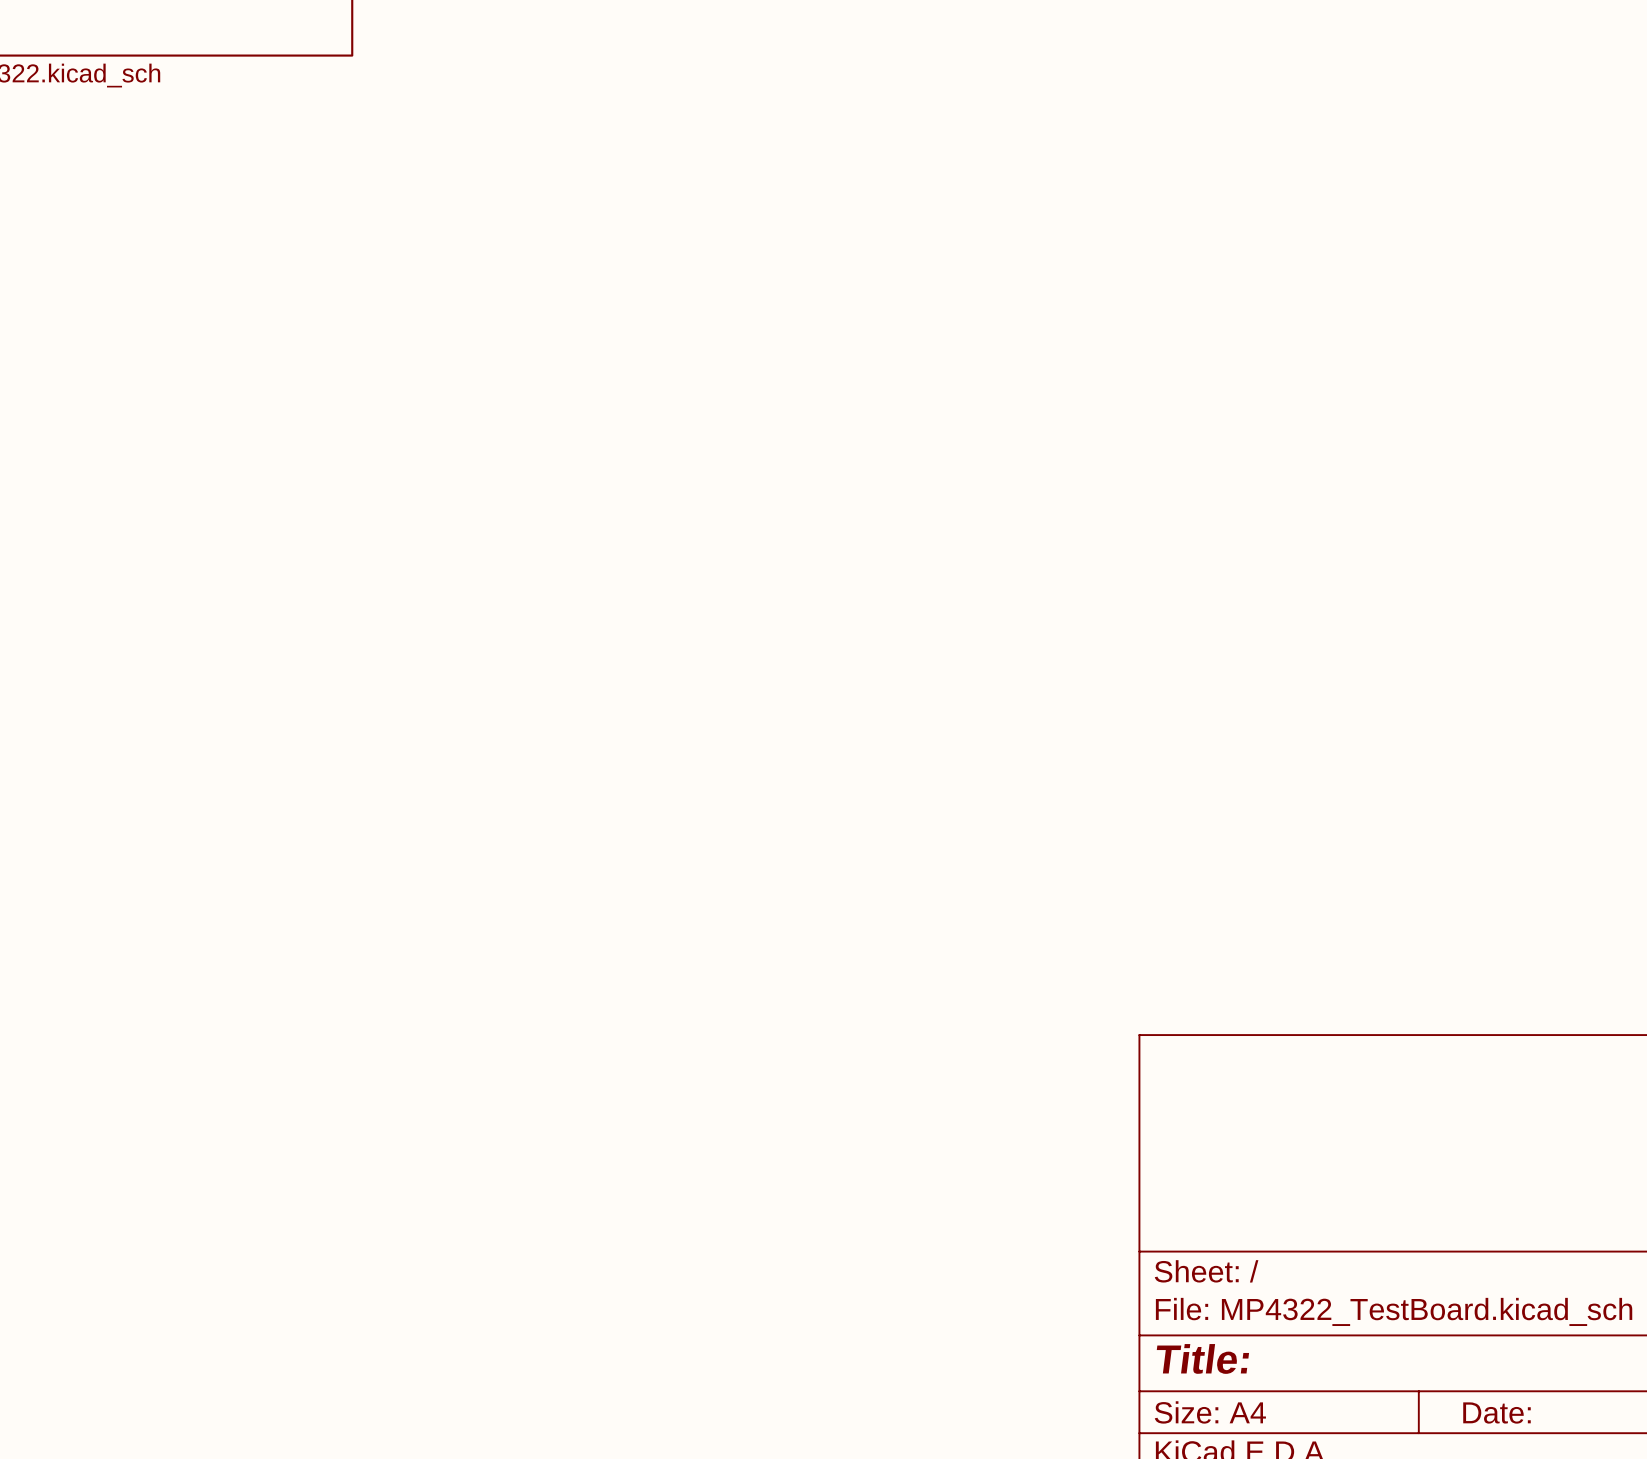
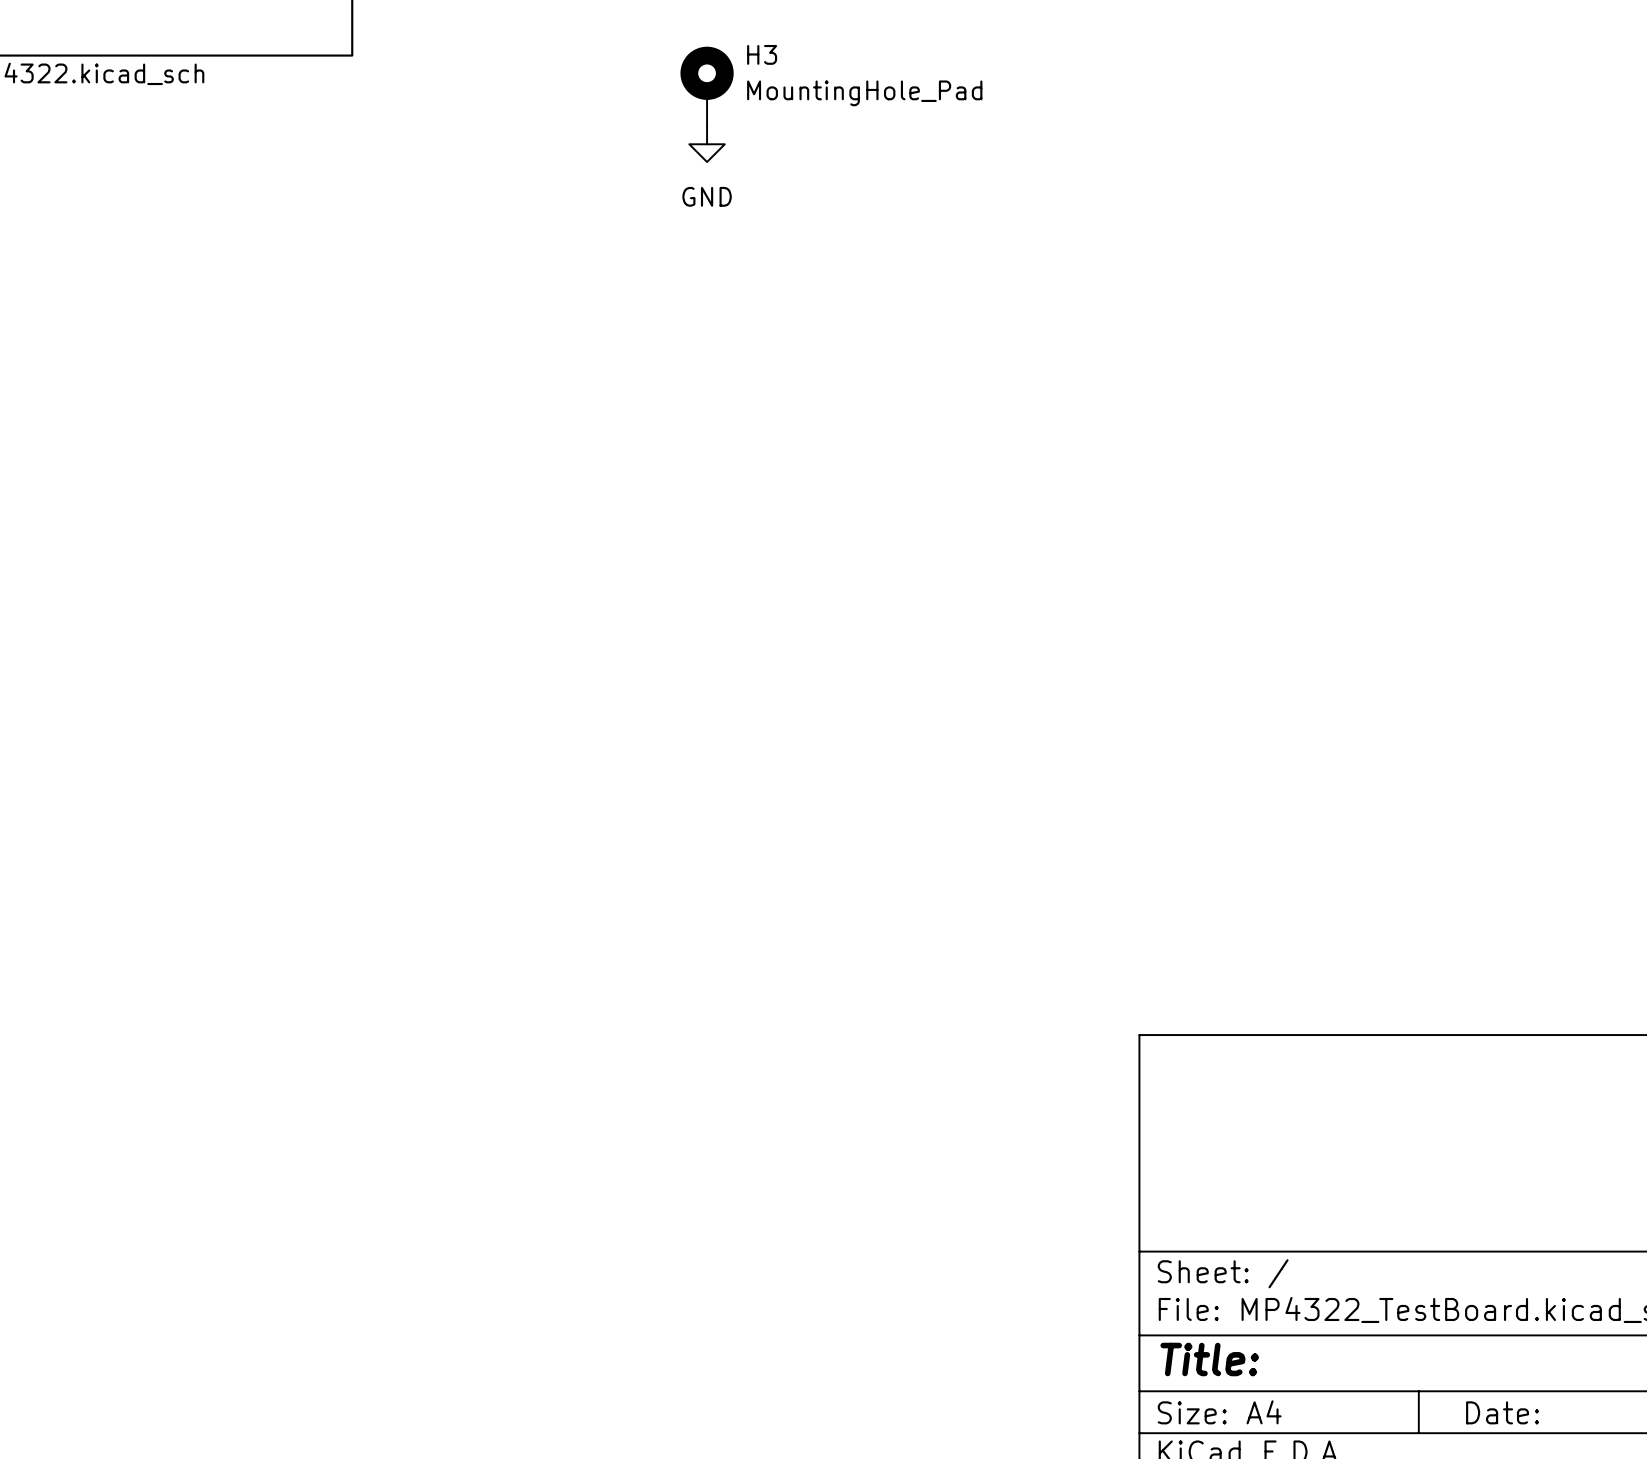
H3: none -> MountingHole_Pad (707, 86)
power symbol: none -> GND (707, 144)

